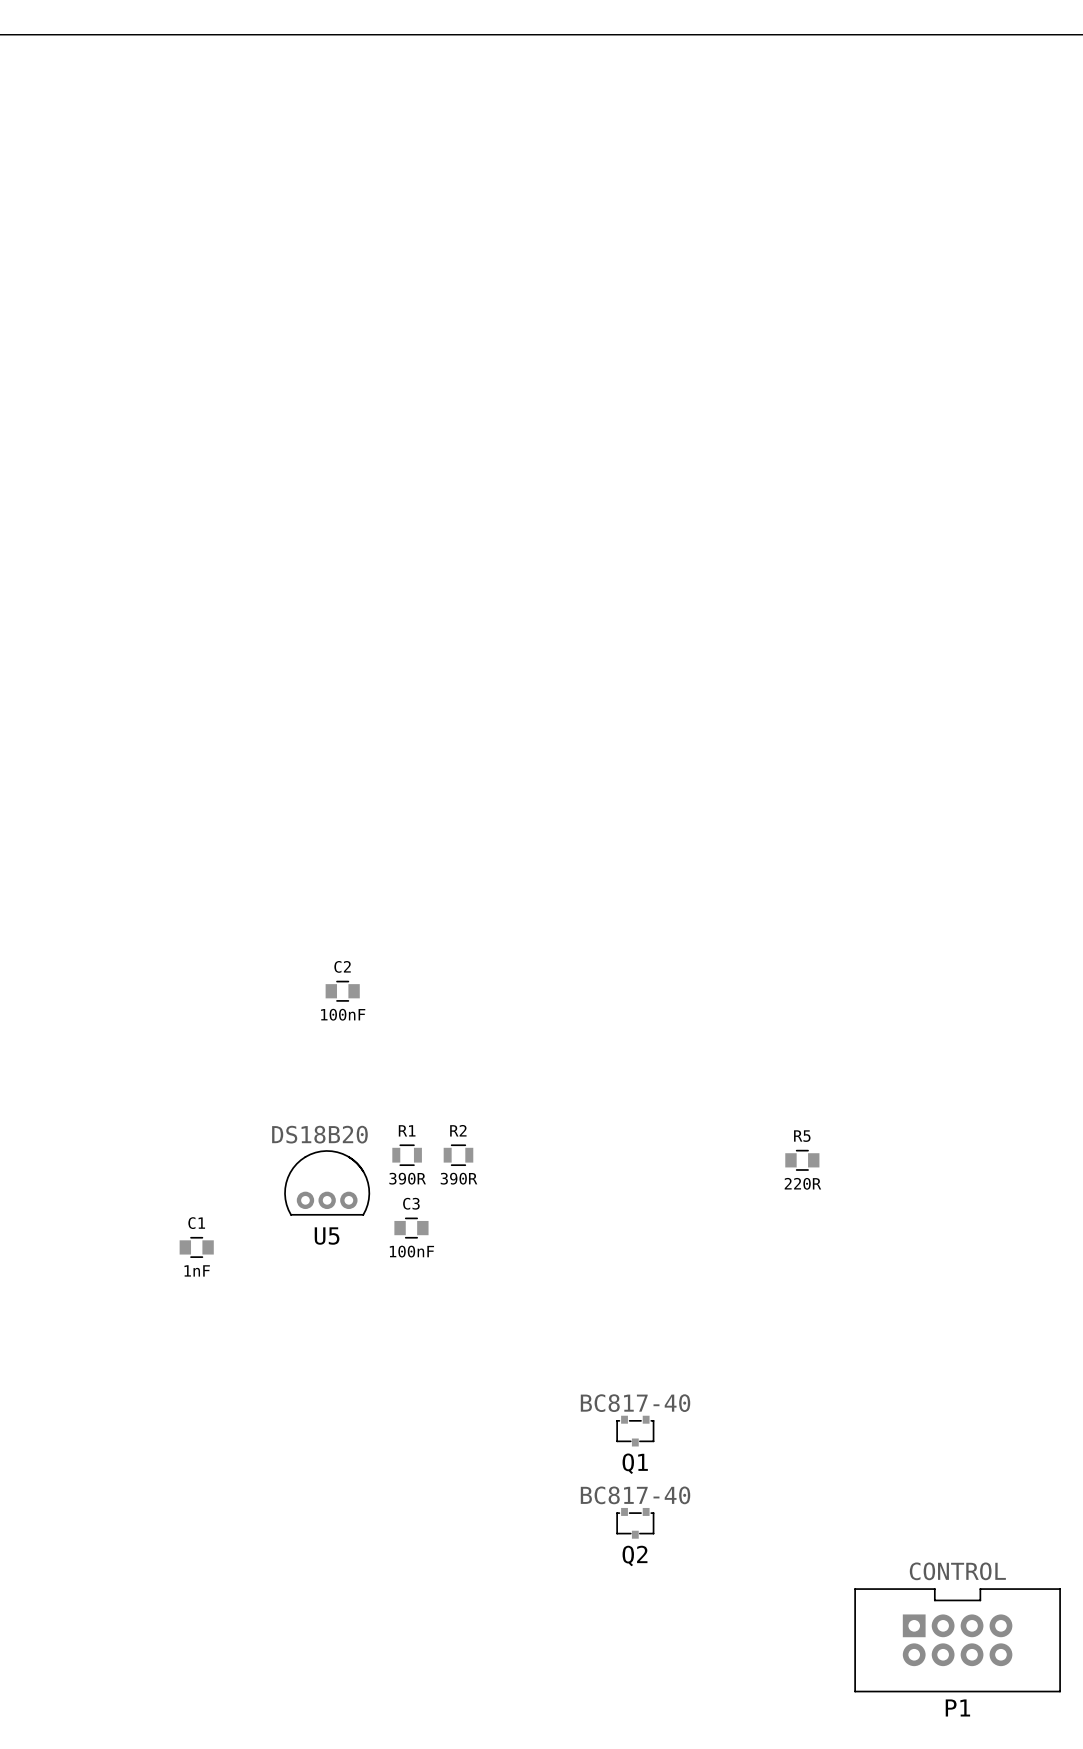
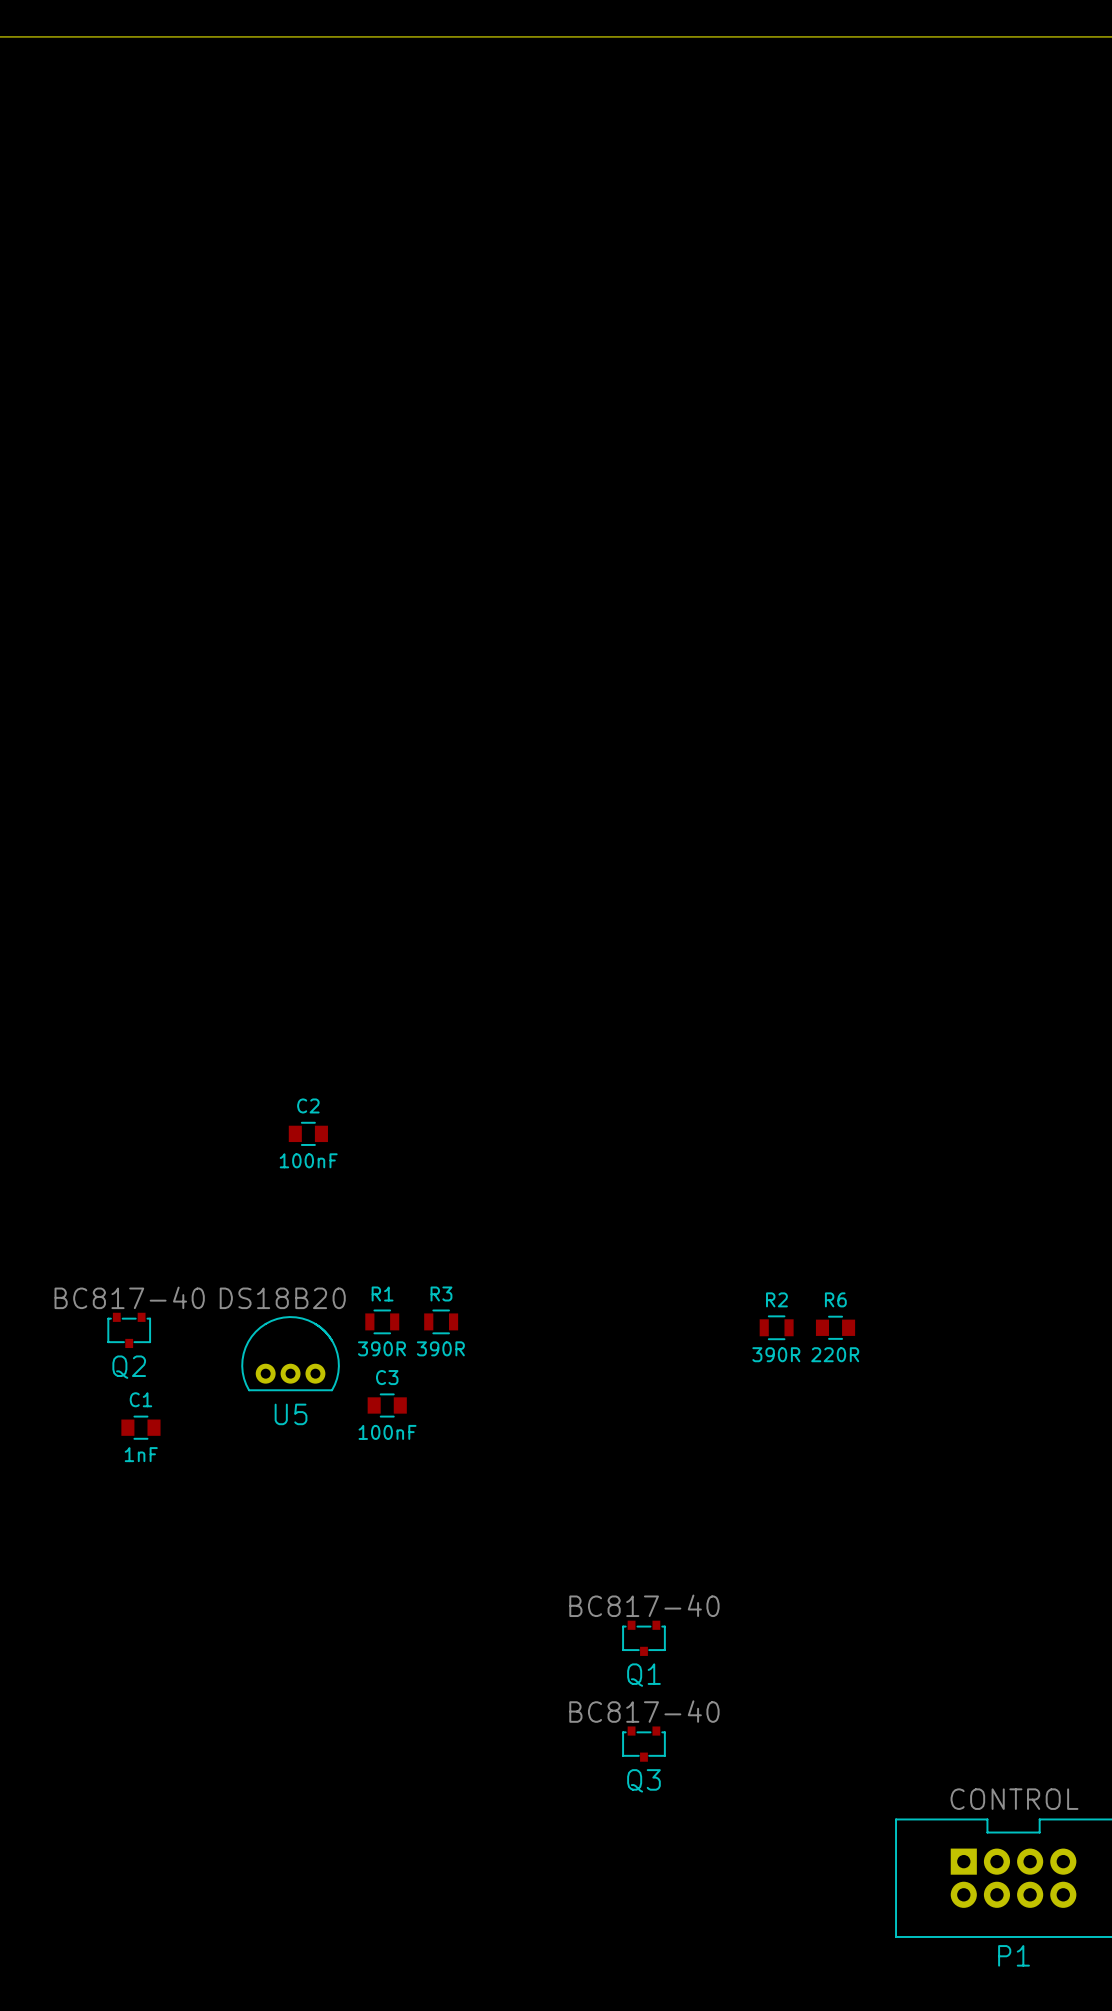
R2 name: R2 (458, 1130) -> R3 (441, 1293)
R5 name: R5 (802, 1136) -> R6 (835, 1299)
R2: none -> 390R (776, 1327)
Q2: none -> BC817-40 (129, 1330)
Q2 name: Q2 (635, 1555) -> Q3 (643, 1780)

